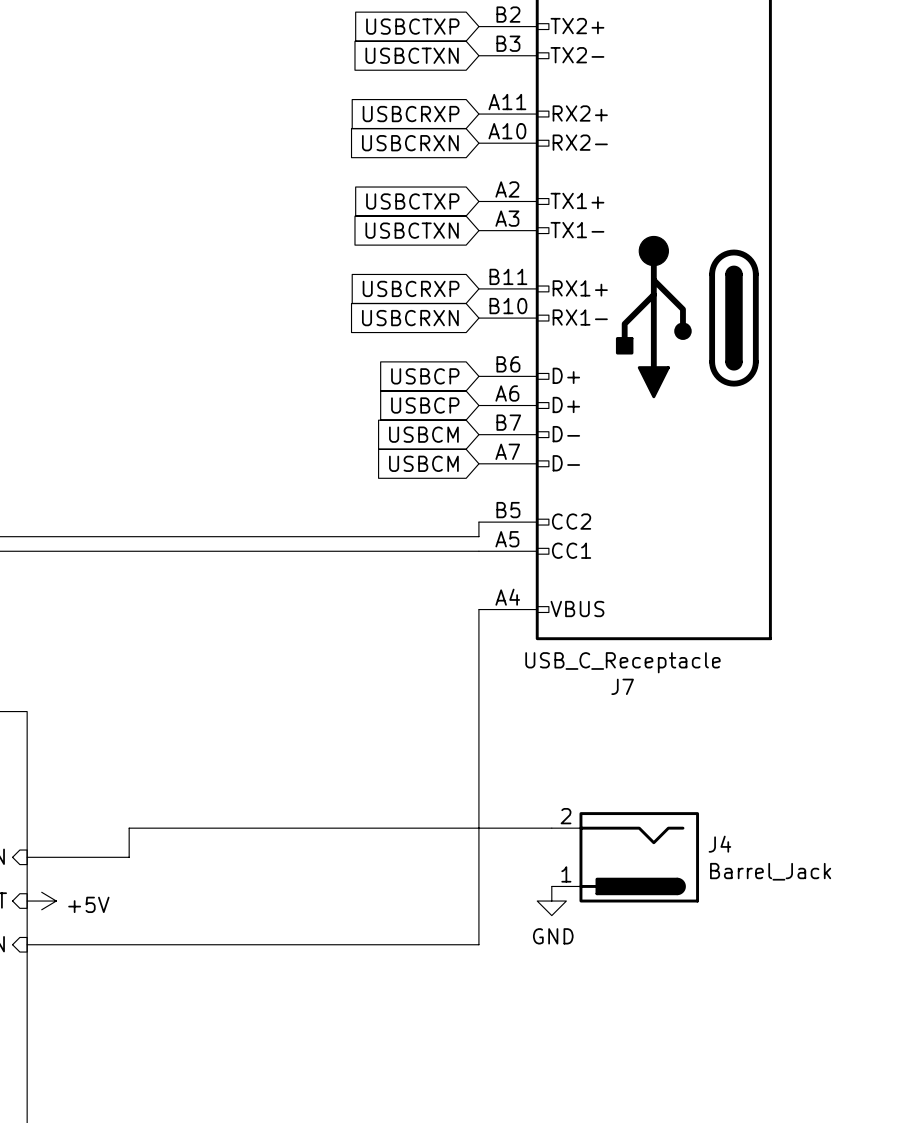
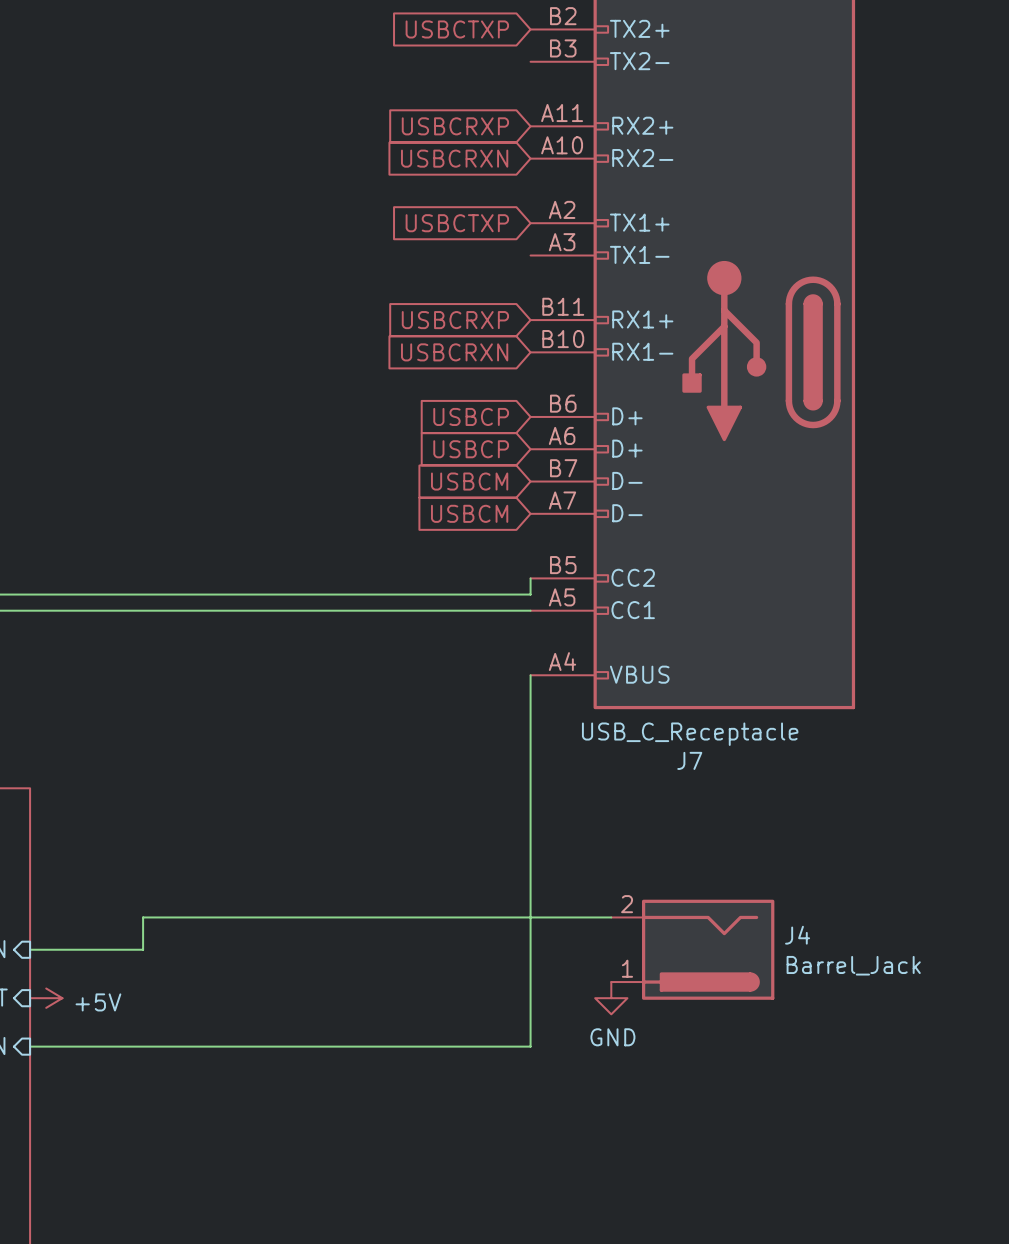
global label: USBCTXN (412, 55) -> none
global label: USBCTXN (412, 230) -> none

